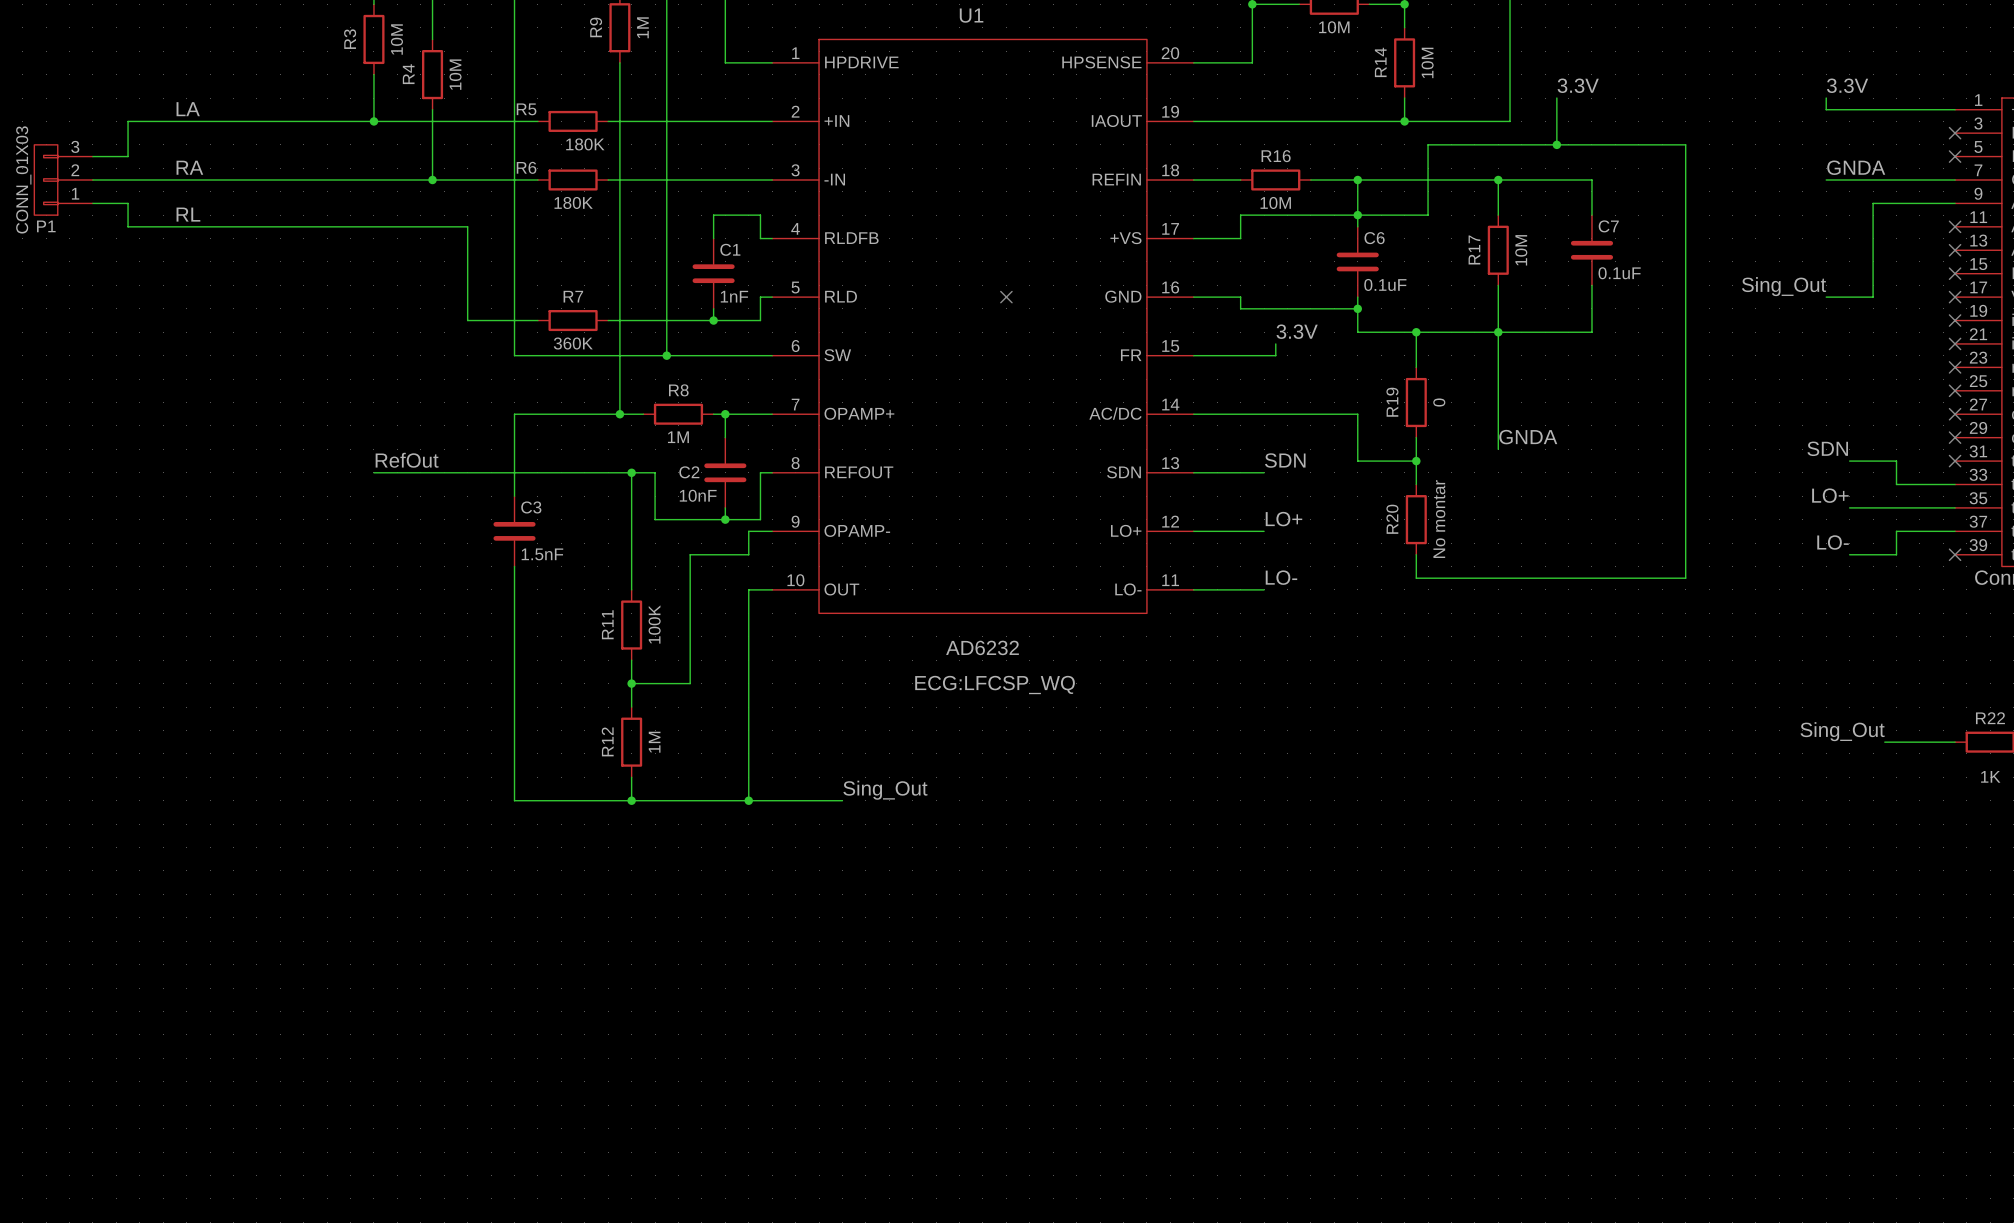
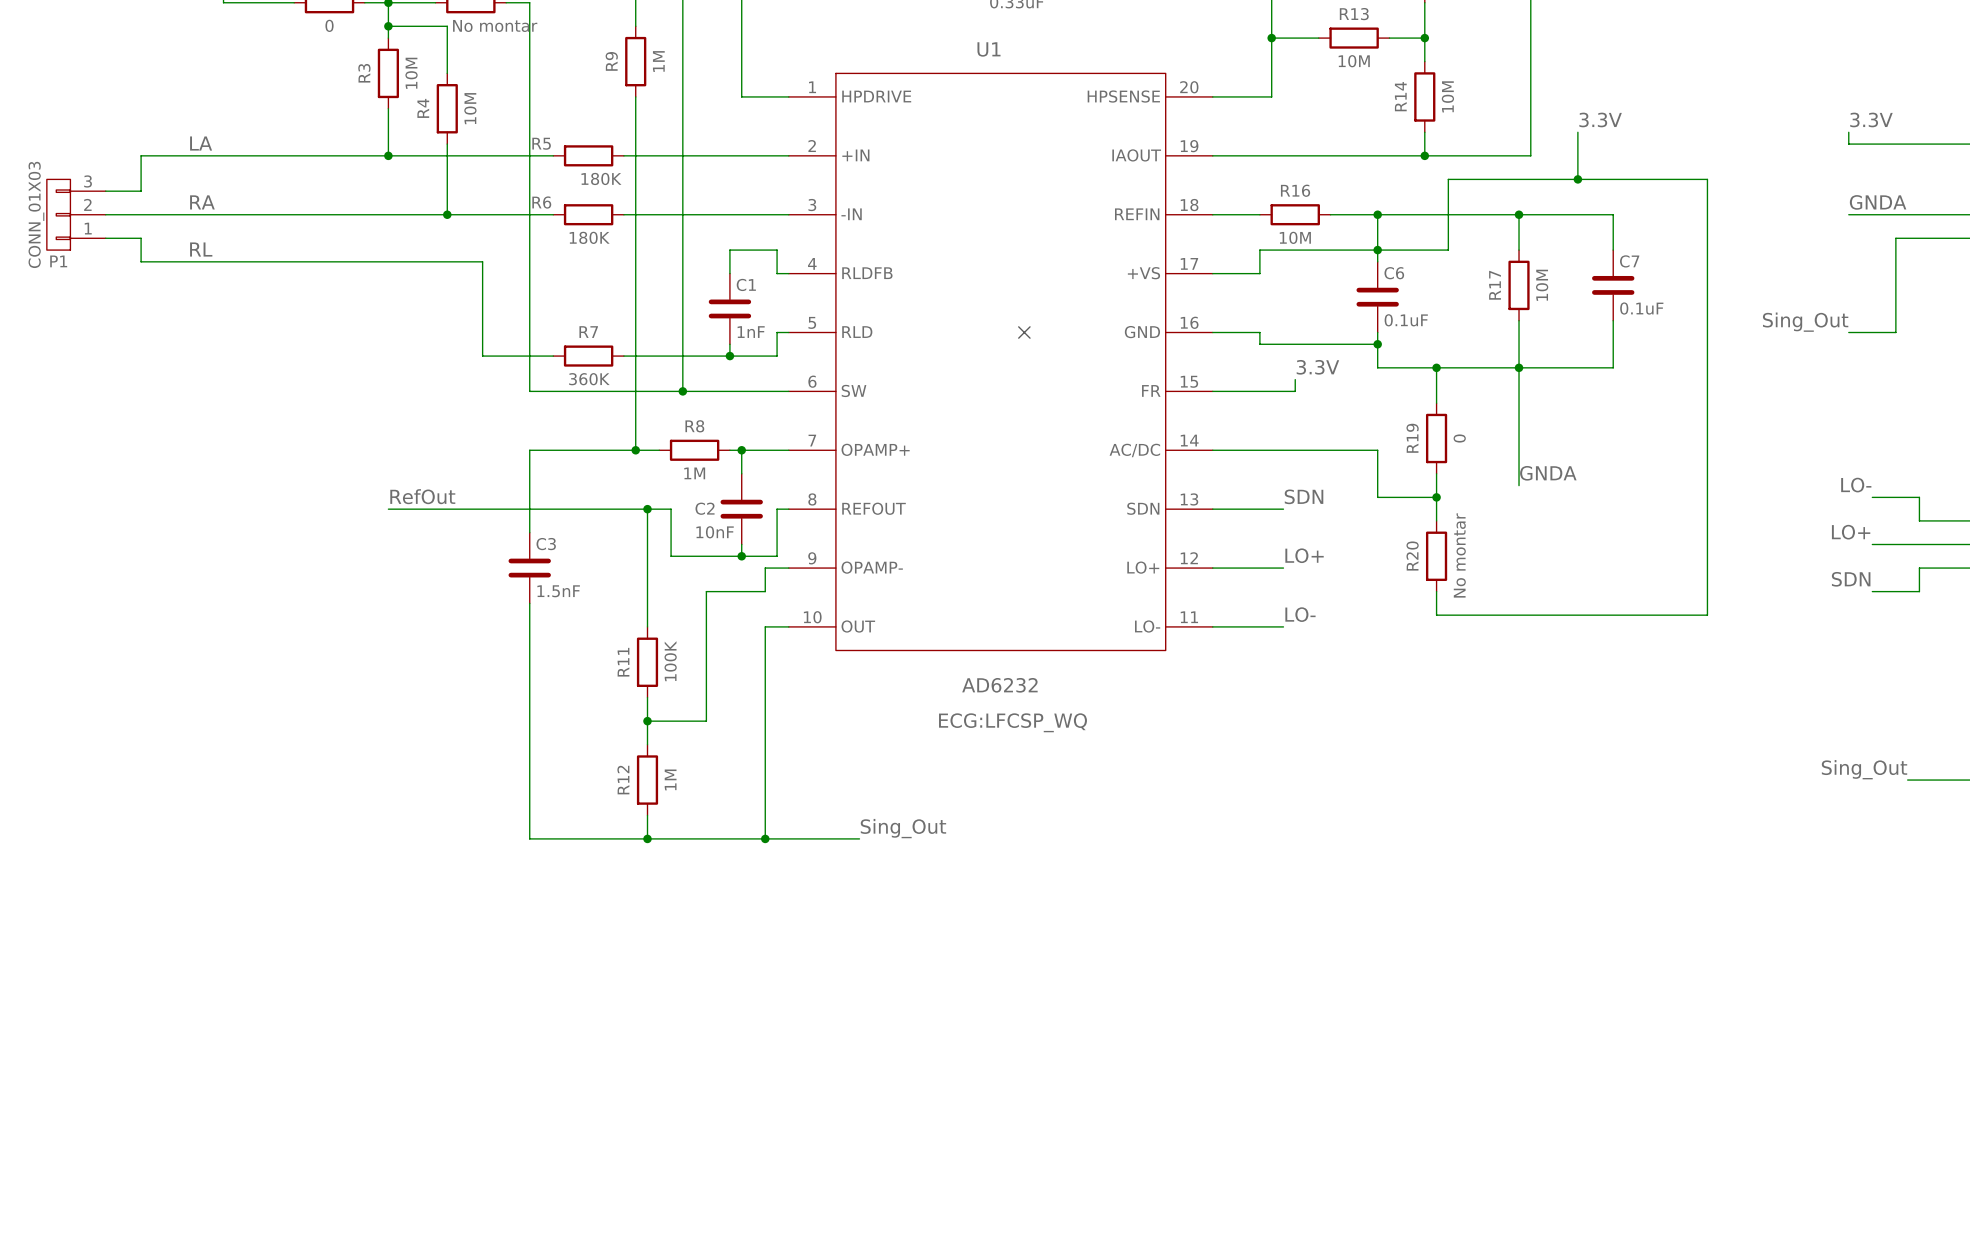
label: SDN (1827, 448) -> LO- (1856, 485)
label: LO- (1833, 542) -> SDN (1851, 579)

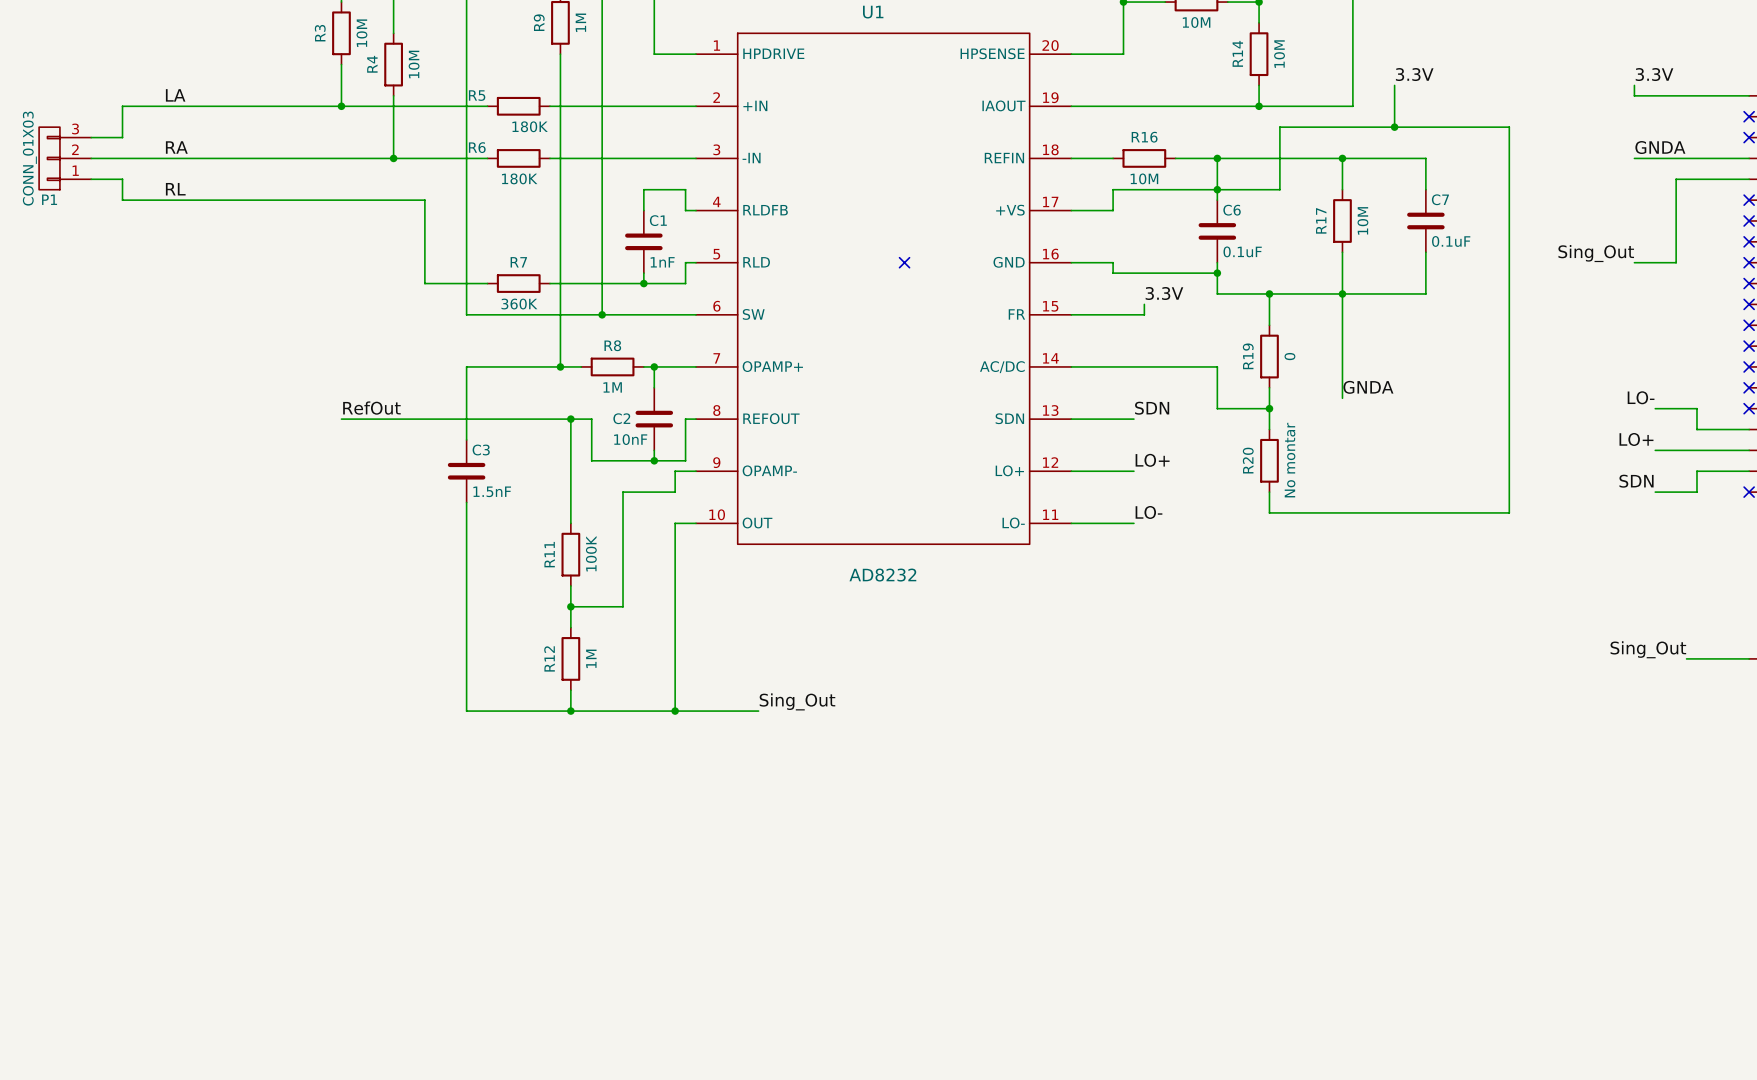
U1 value: AD6232 (999, 685) -> AD8232 (882, 575)
U1 text: ECG:LFCSP_WQ (1013, 722) -> none

